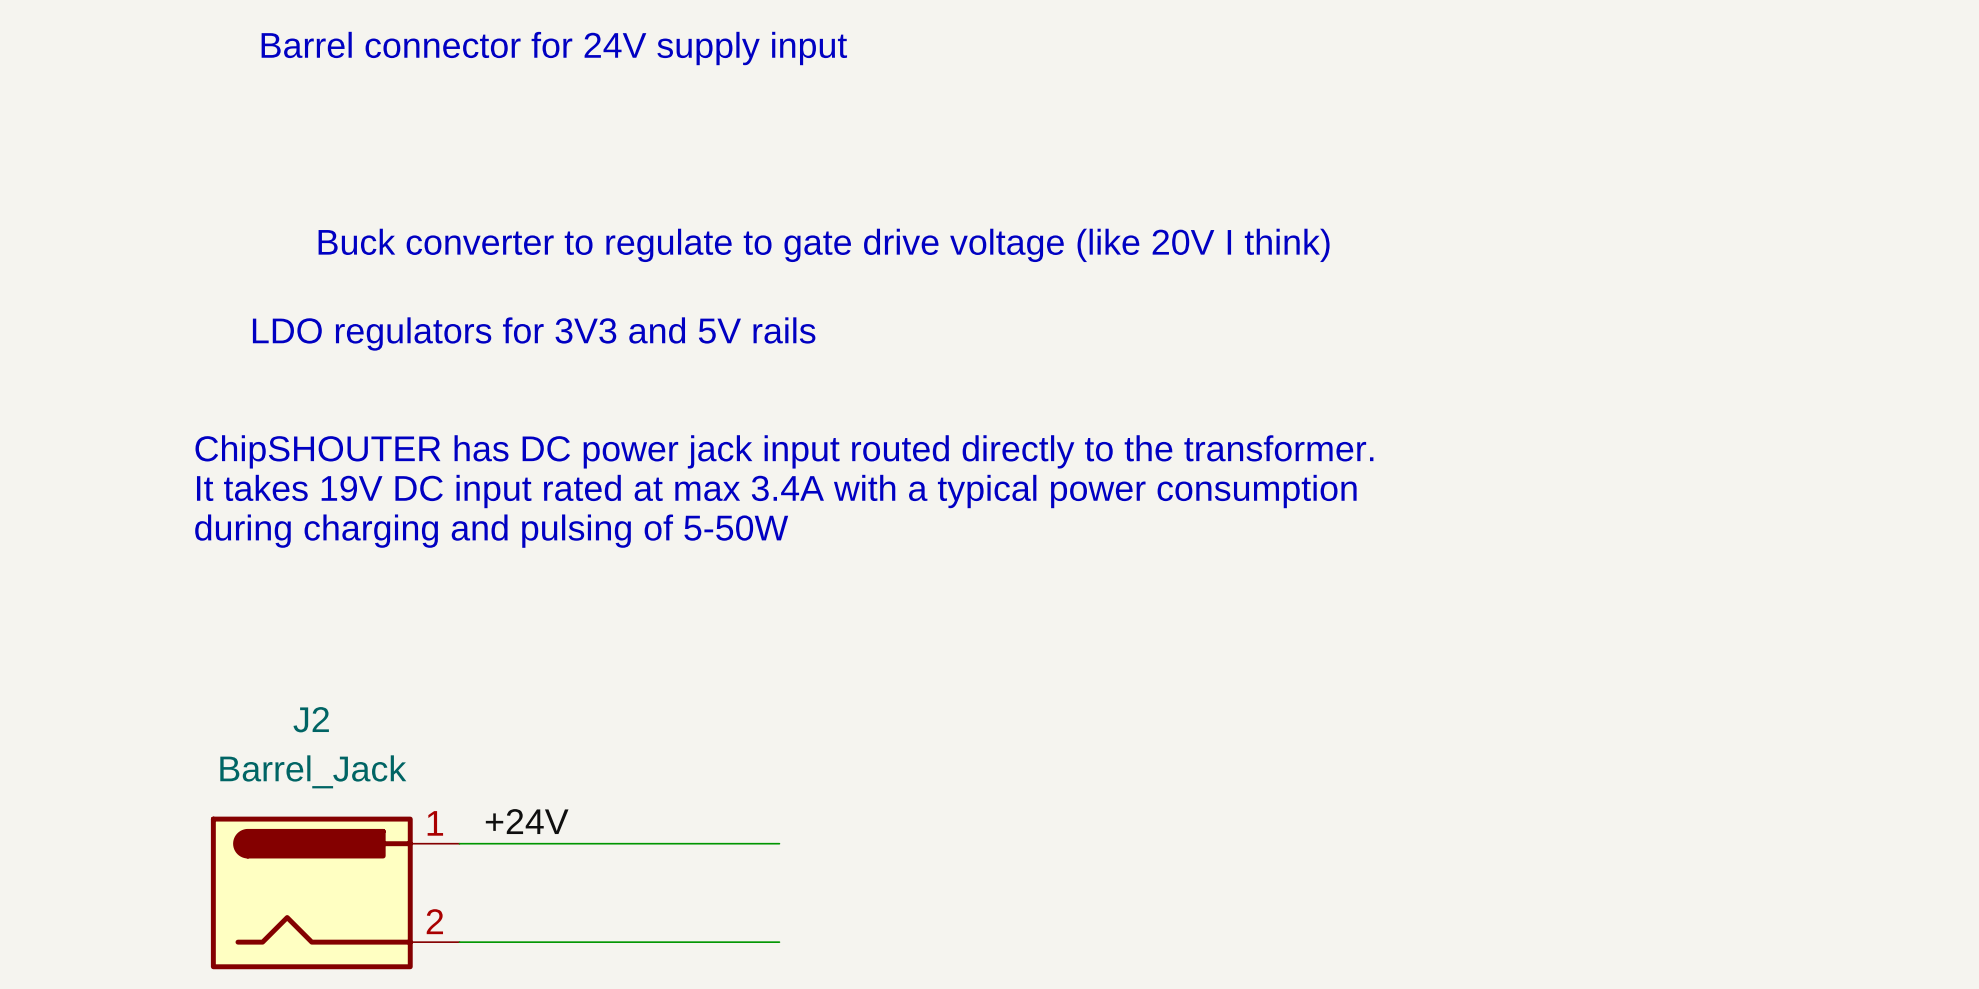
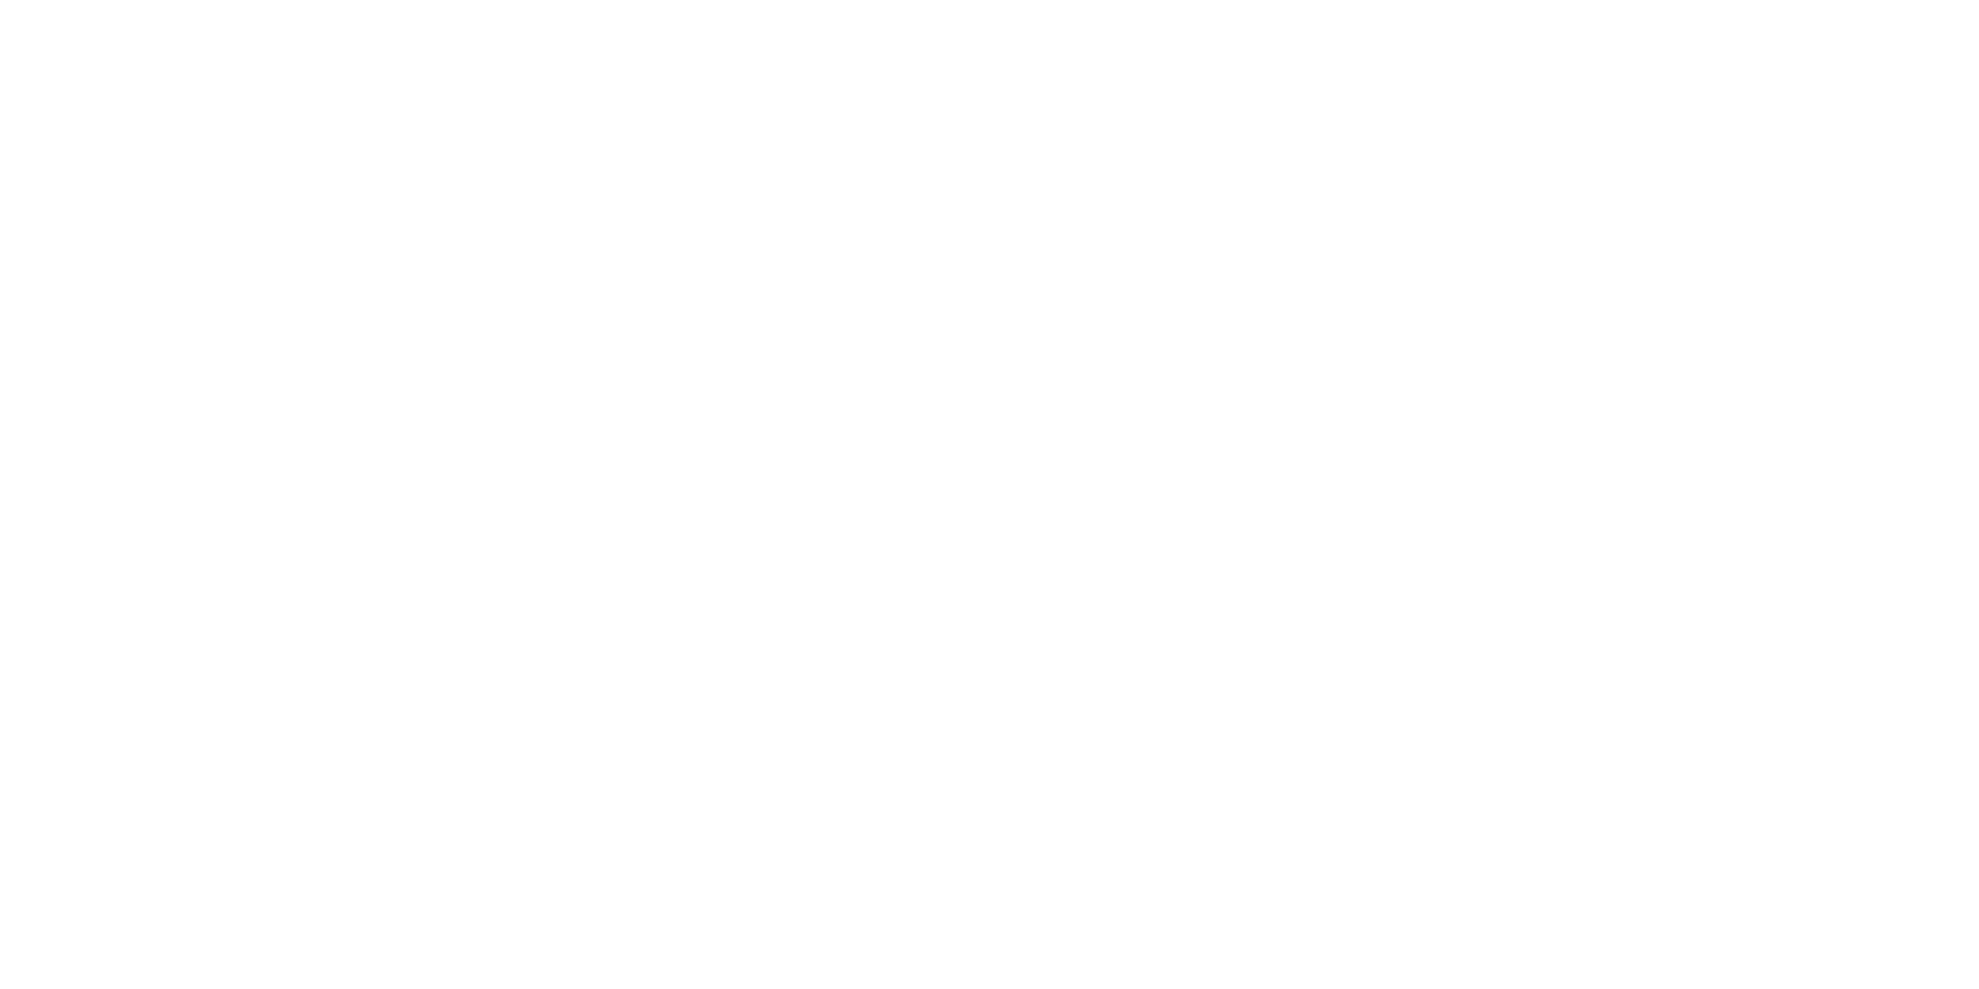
text: Barrel connector for 24V supply input (554, 48) -> none
text: Buck converter to regulate to gate drive voltage (like 20V I think) (824, 245) -> none
text: LDO regulators for 3V3 and 5V rails (534, 333) -> none
text: ChipSHOUTER has DC power jack input routed directly to the transformer. (784, 451) -> none
text: It takes 19V DC input rated at max 3.4A with a typical power consumption (776, 491) -> none
text: during charging and pulsing of 5-50W (491, 531) -> none
label: +24V (527, 821) -> none
wire: (459, 843) (779, 843) -> none
J2: Barrel_Jack (335, 892) -> none
wire: (459, 942) (779, 942) -> none

